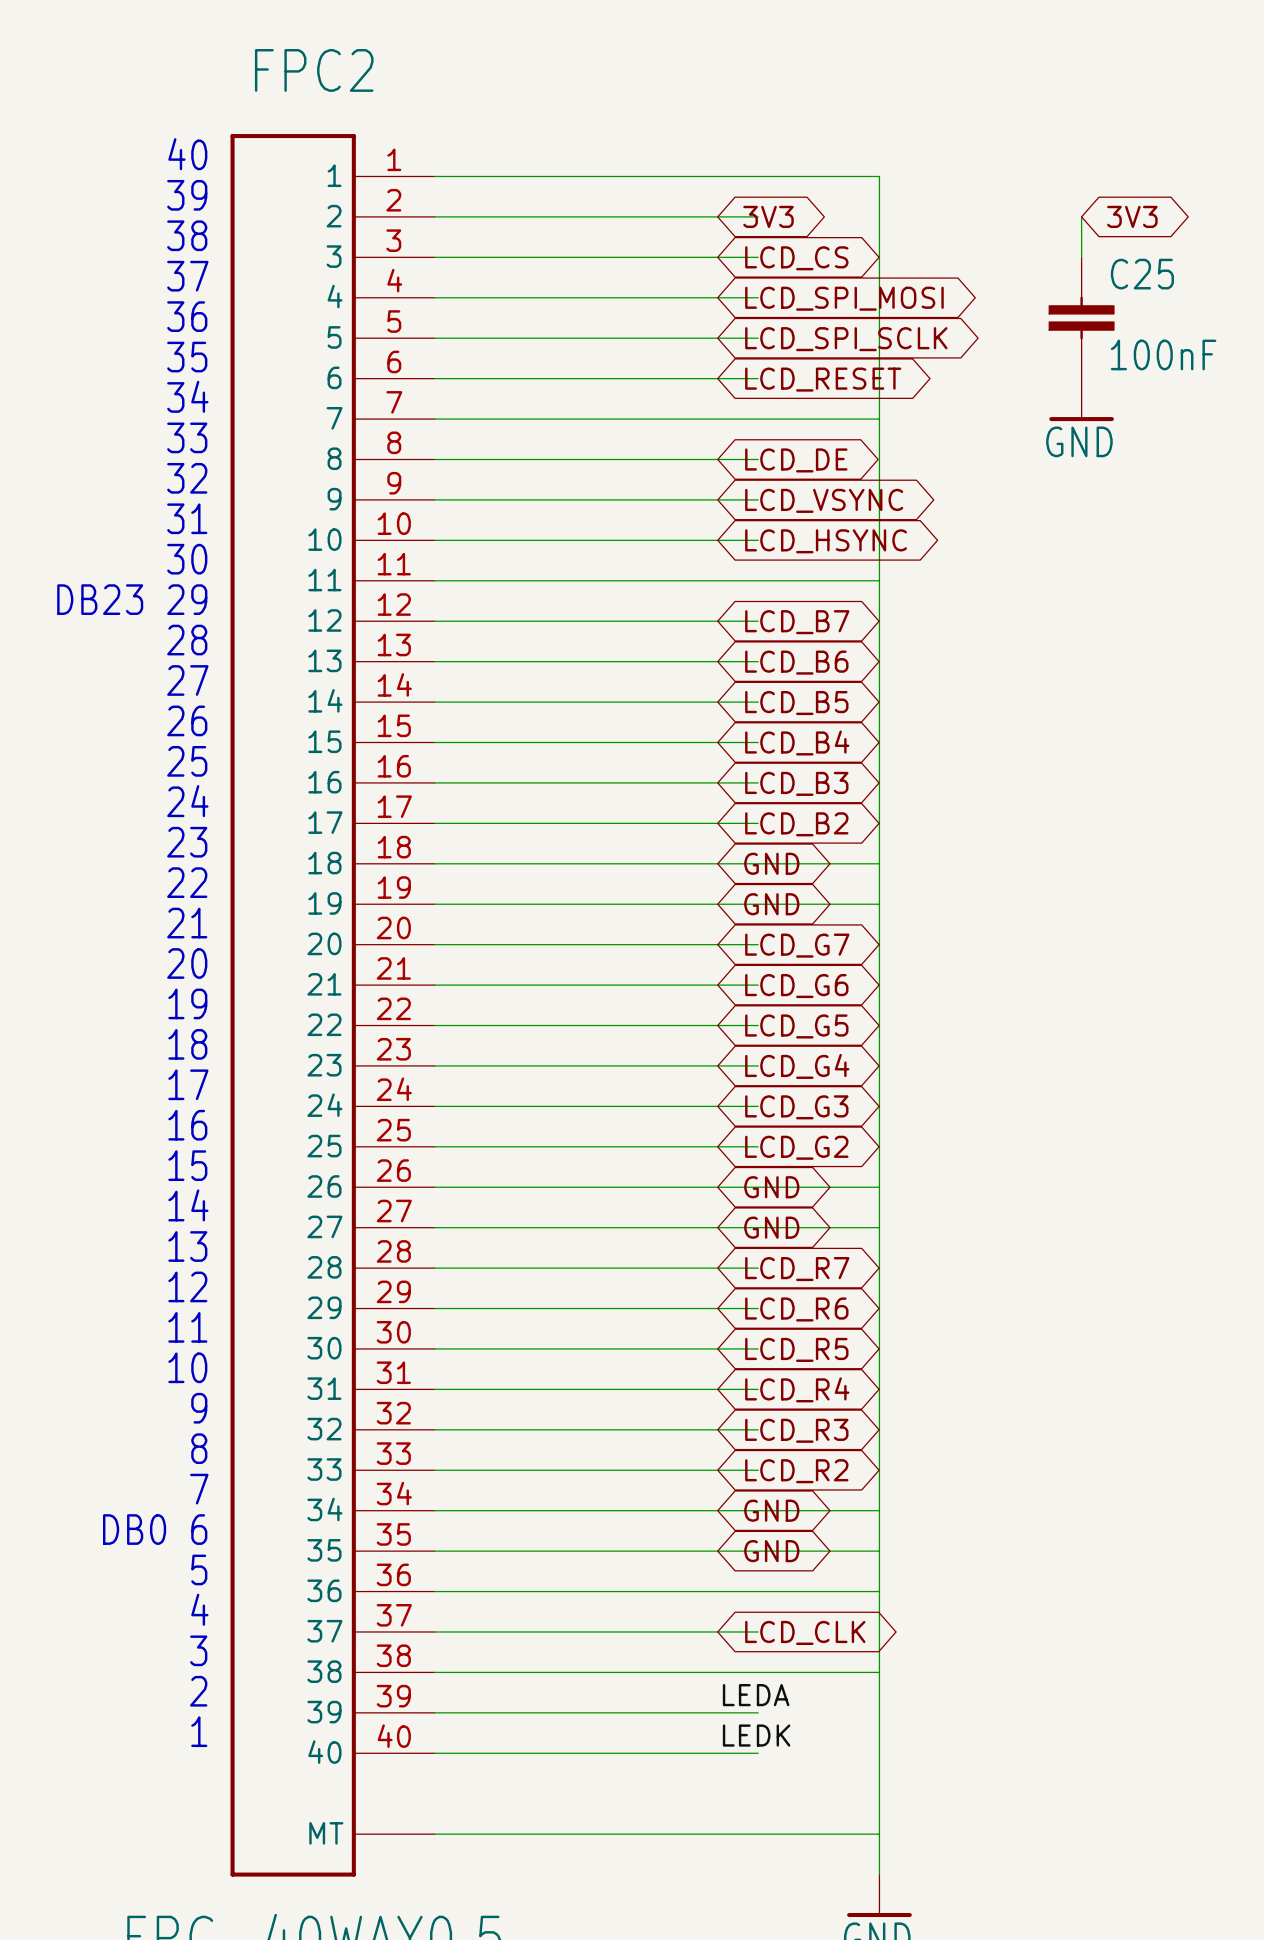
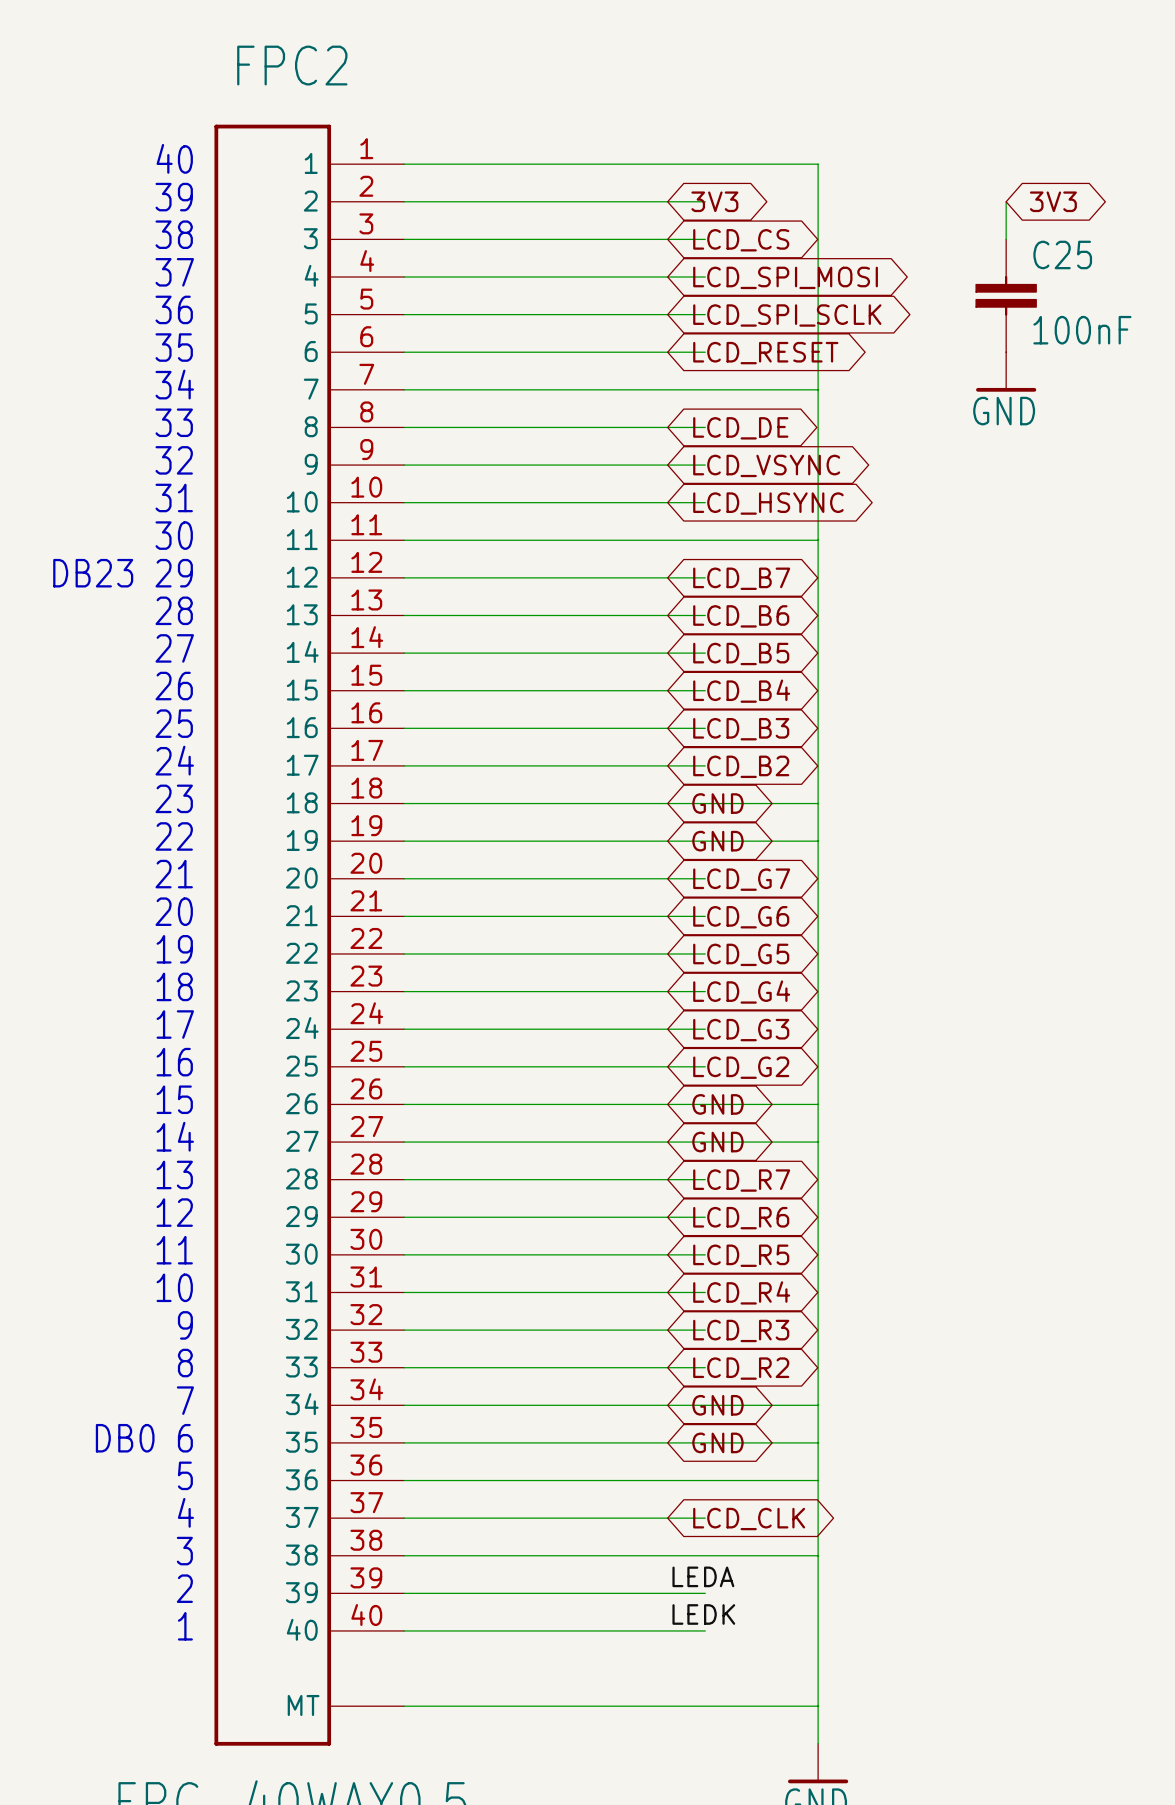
text position: 40 (187, 154) -> 40 (174, 158)
text position: 39 (187, 195) -> 39 (174, 197)
text position: 38 (187, 235) -> 38 (174, 234)
text position: 37 (187, 276) -> 37 (174, 272)
text position: 36 (187, 316) -> 36 (174, 309)
text position: 35 (187, 357) -> 35 (174, 347)
text position: 34 (187, 396) -> 34 (174, 384)
text position: 33 (187, 437) -> 33 (174, 422)
text position: 32 (187, 478) -> 32 (174, 460)
text position: 31 (187, 518) -> 31 (174, 497)
text position: 30 (187, 559) -> 30 (174, 535)
text position: DB23 29 (132, 599) -> DB23 29 (123, 573)
text position: 28 (187, 640) -> 28 (174, 610)
text position: 27 (187, 680) -> 27 (174, 648)
text position: 26 (187, 720) -> 26 (174, 686)
text position: 25 (187, 761) -> 25 (174, 723)
text position: 24 (187, 801) -> 24 (174, 760)
text position: 23 (187, 842) -> 23 (174, 798)
text position: 22 (187, 882) -> 22 (174, 836)
text position: 21 (187, 923) -> 21 (174, 874)
text position: 20 (187, 963) -> 20 (174, 911)
text position: 19 (187, 1003) -> 19 (174, 949)
text position: 18 (187, 1044) -> 18 (174, 986)
text position: 17 (188, 1084) -> 17 (175, 1024)
text position: 16 (187, 1125) -> 16 (174, 1062)
text position: 15 (187, 1165) -> 15 (174, 1099)
text position: 14 (188, 1205) -> 14 (175, 1136)
text position: 13 (187, 1246) -> 13 (174, 1174)
text position: 12 (187, 1286) -> 12 (174, 1212)
text position: 11 (187, 1327) -> 11 (174, 1250)
text position: 10 (187, 1367) -> 10 (174, 1287)
text position: 9 (199, 1408) -> 9 (185, 1325)
text position: 8 (199, 1448) -> 8 (185, 1363)
text position: 7 (199, 1489) -> 7 (185, 1400)
text position: DB0 6 (155, 1529) -> DB0 6 (144, 1438)
text position: 5 (199, 1569) -> 5 (185, 1475)
text position: 4 (199, 1609) -> 4 (185, 1512)
text position: 3 (198, 1650) -> 3 (184, 1551)
text position: 2 (198, 1691) -> 2 (184, 1588)
text position: 1 (199, 1731) -> 1 (185, 1626)

